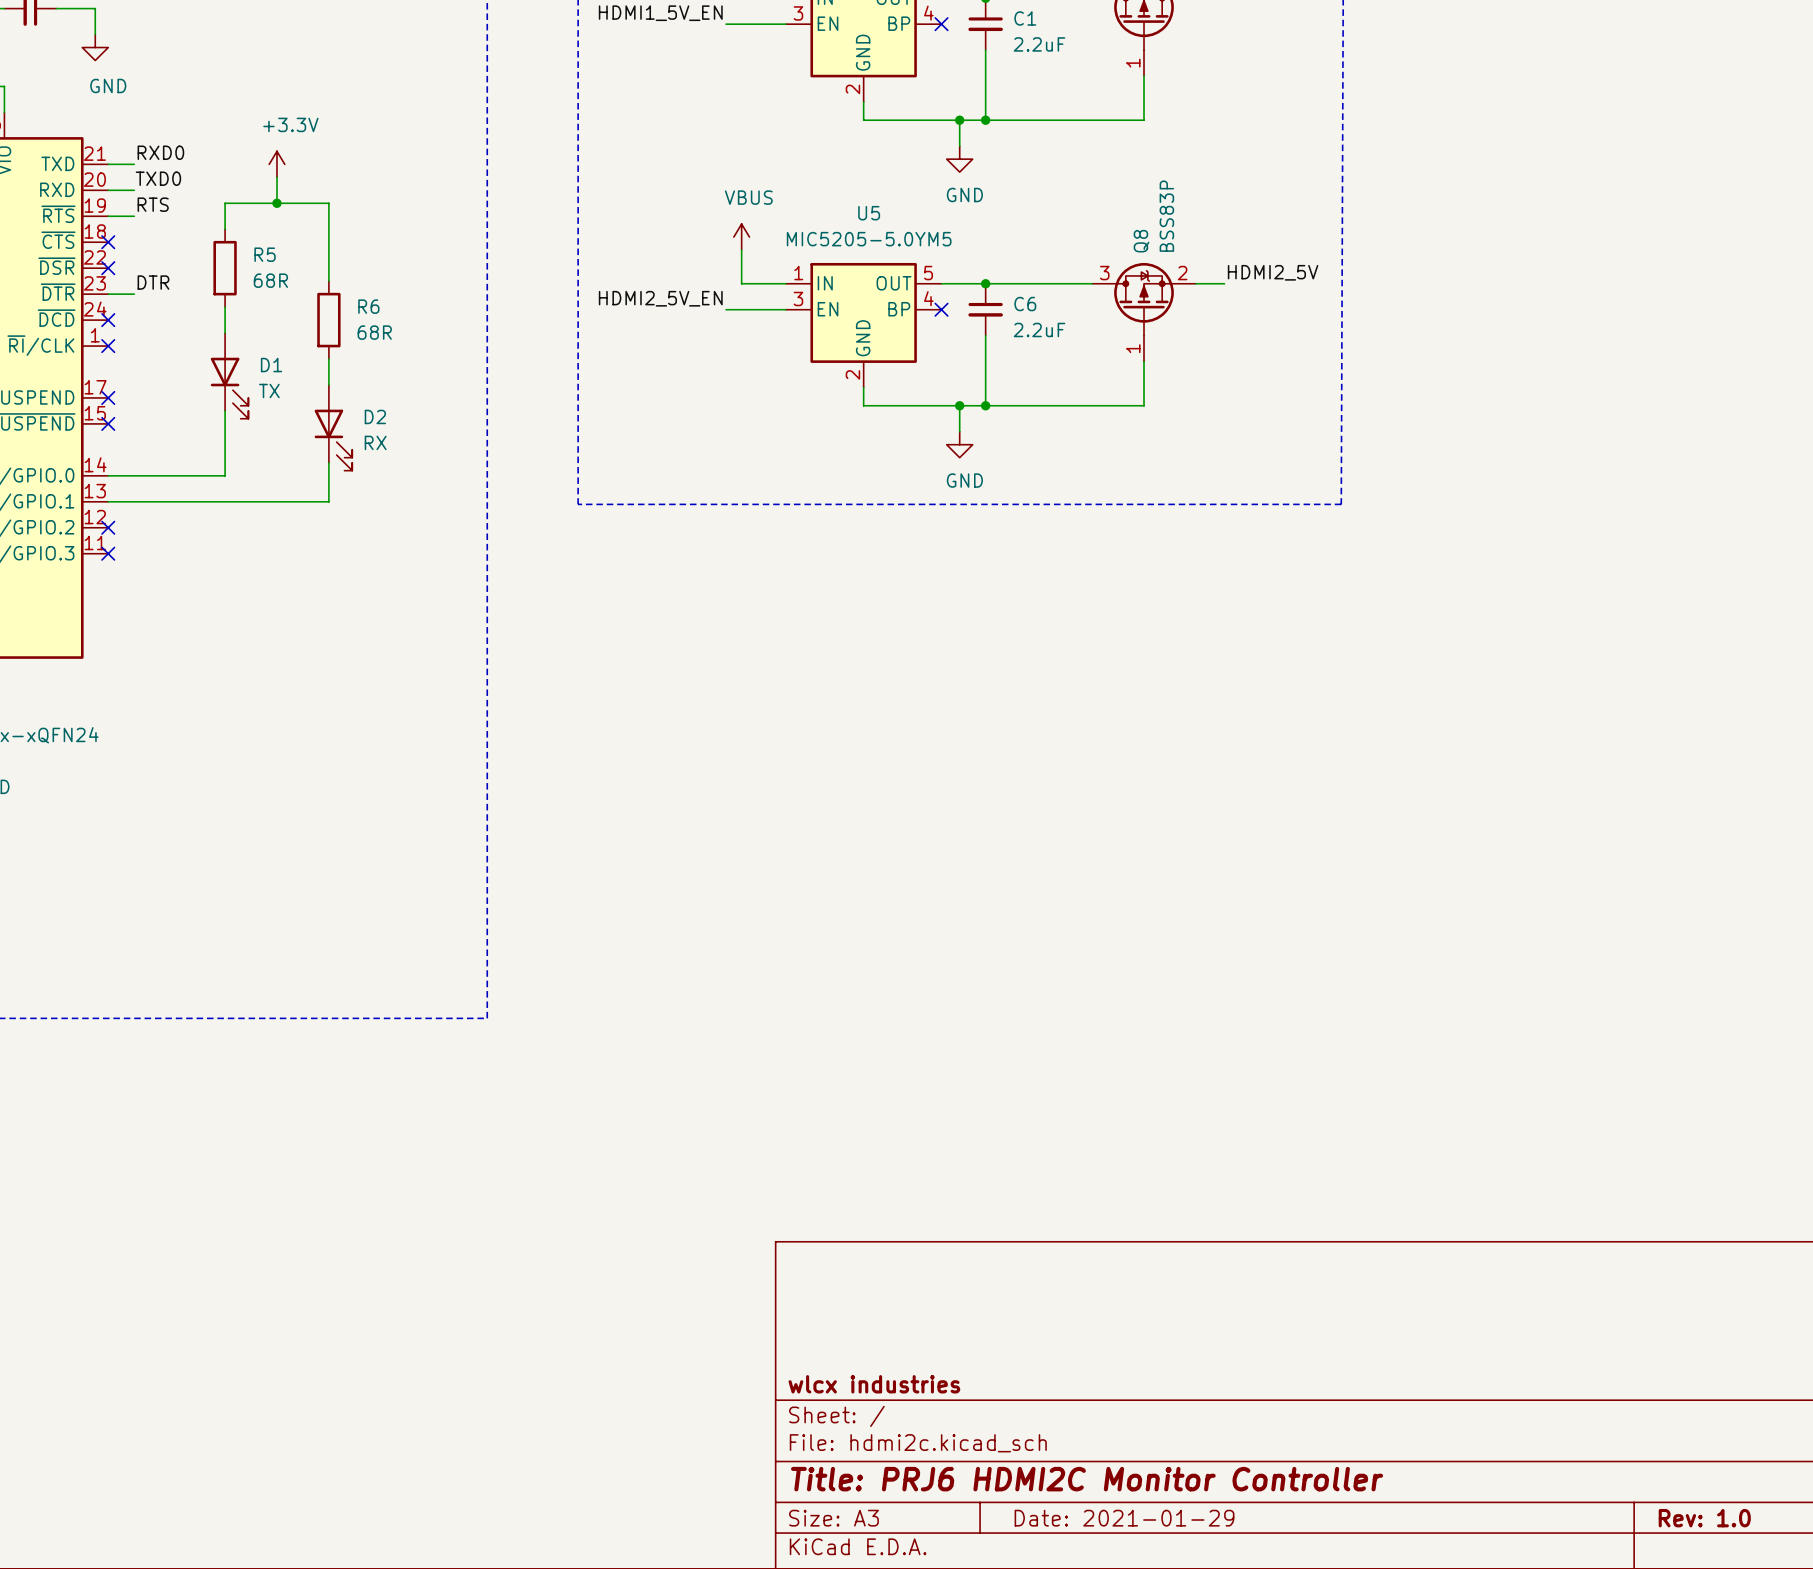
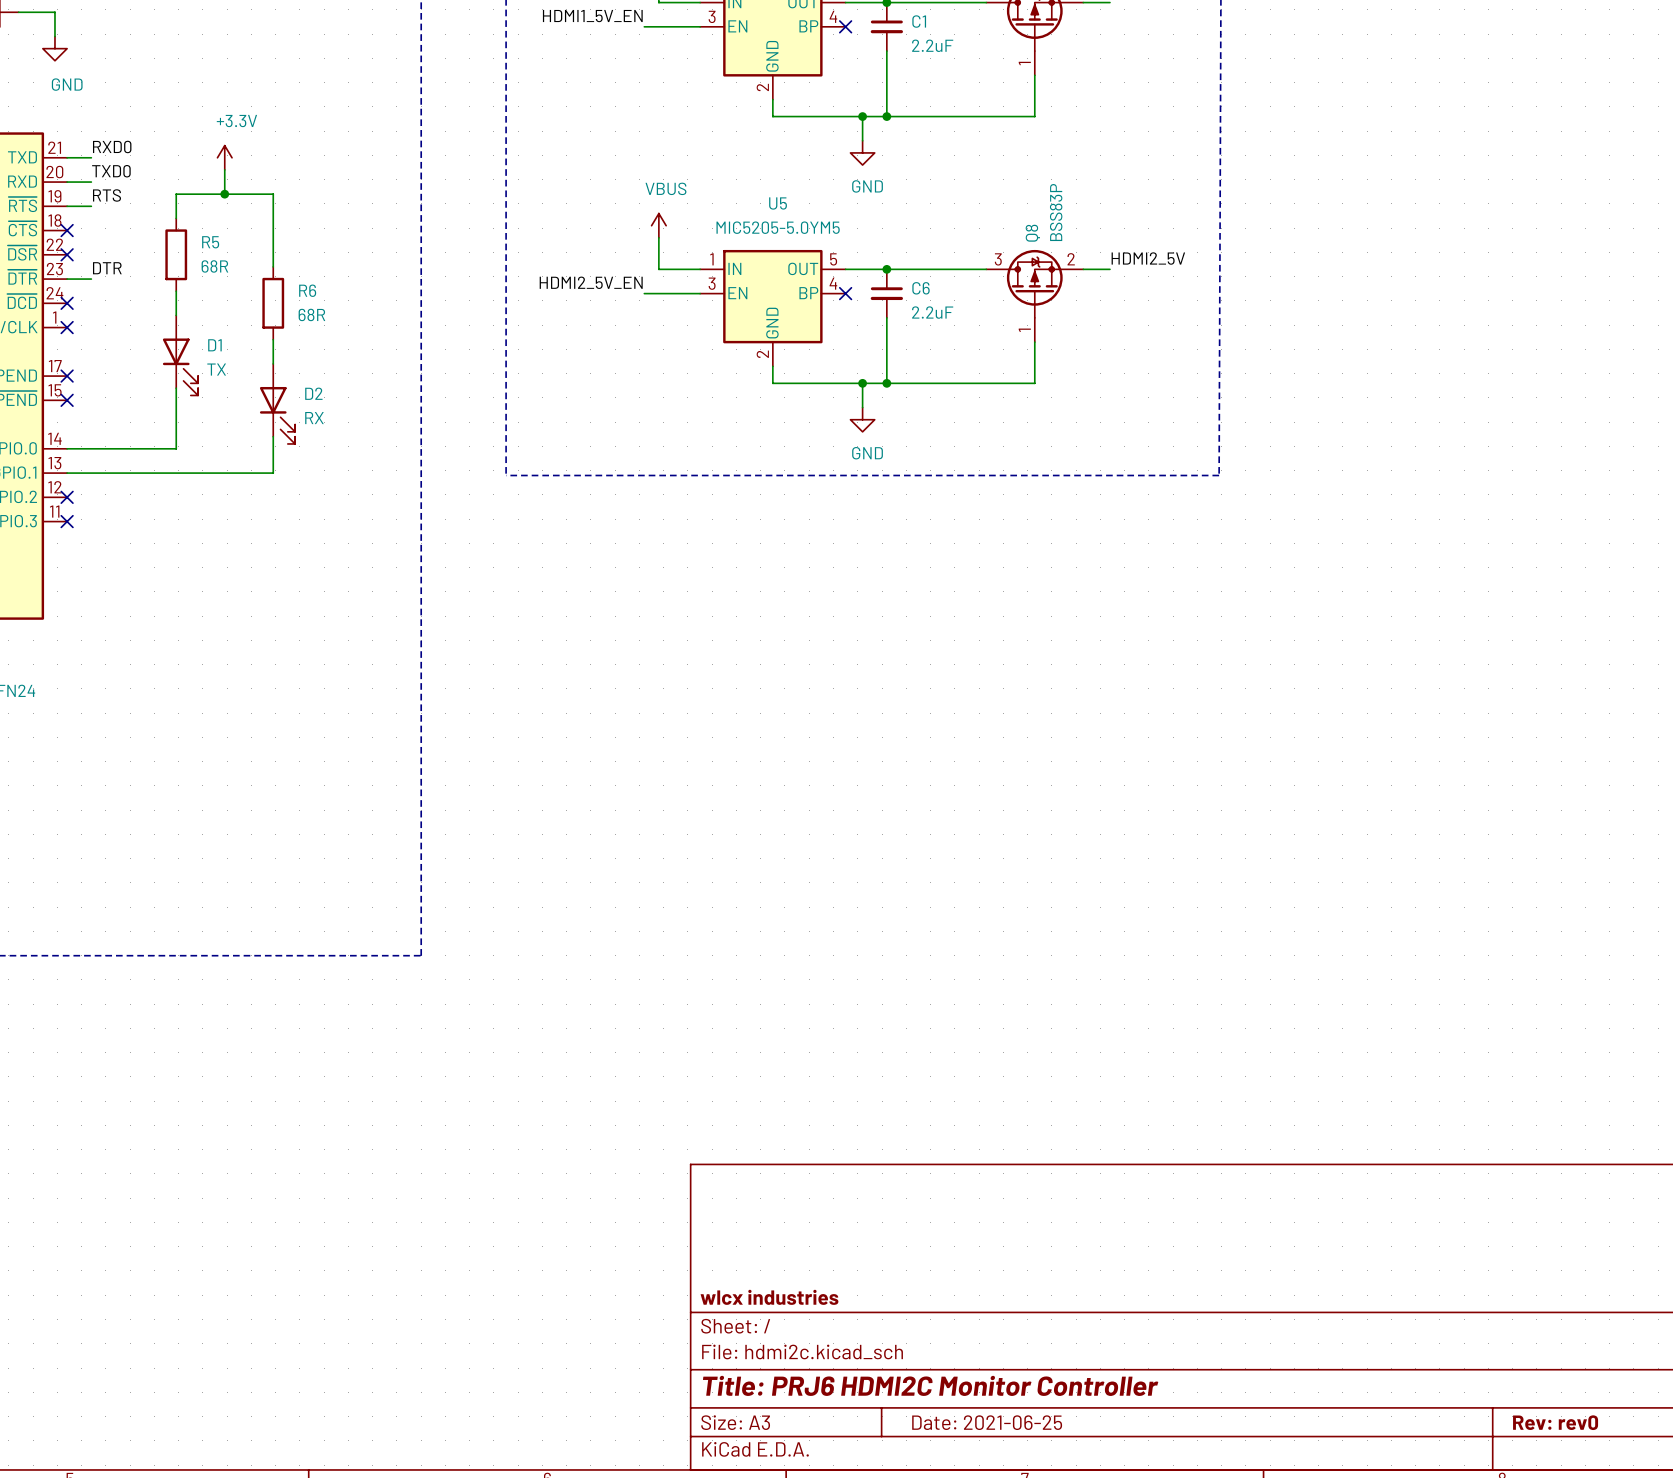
title block: Date: 2021-01-29 (1124, 1518) -> Date: 2021-06-25 (987, 1422)
title block: Rev: 1.0 (1704, 1518) -> Rev: rev0 (1555, 1422)

